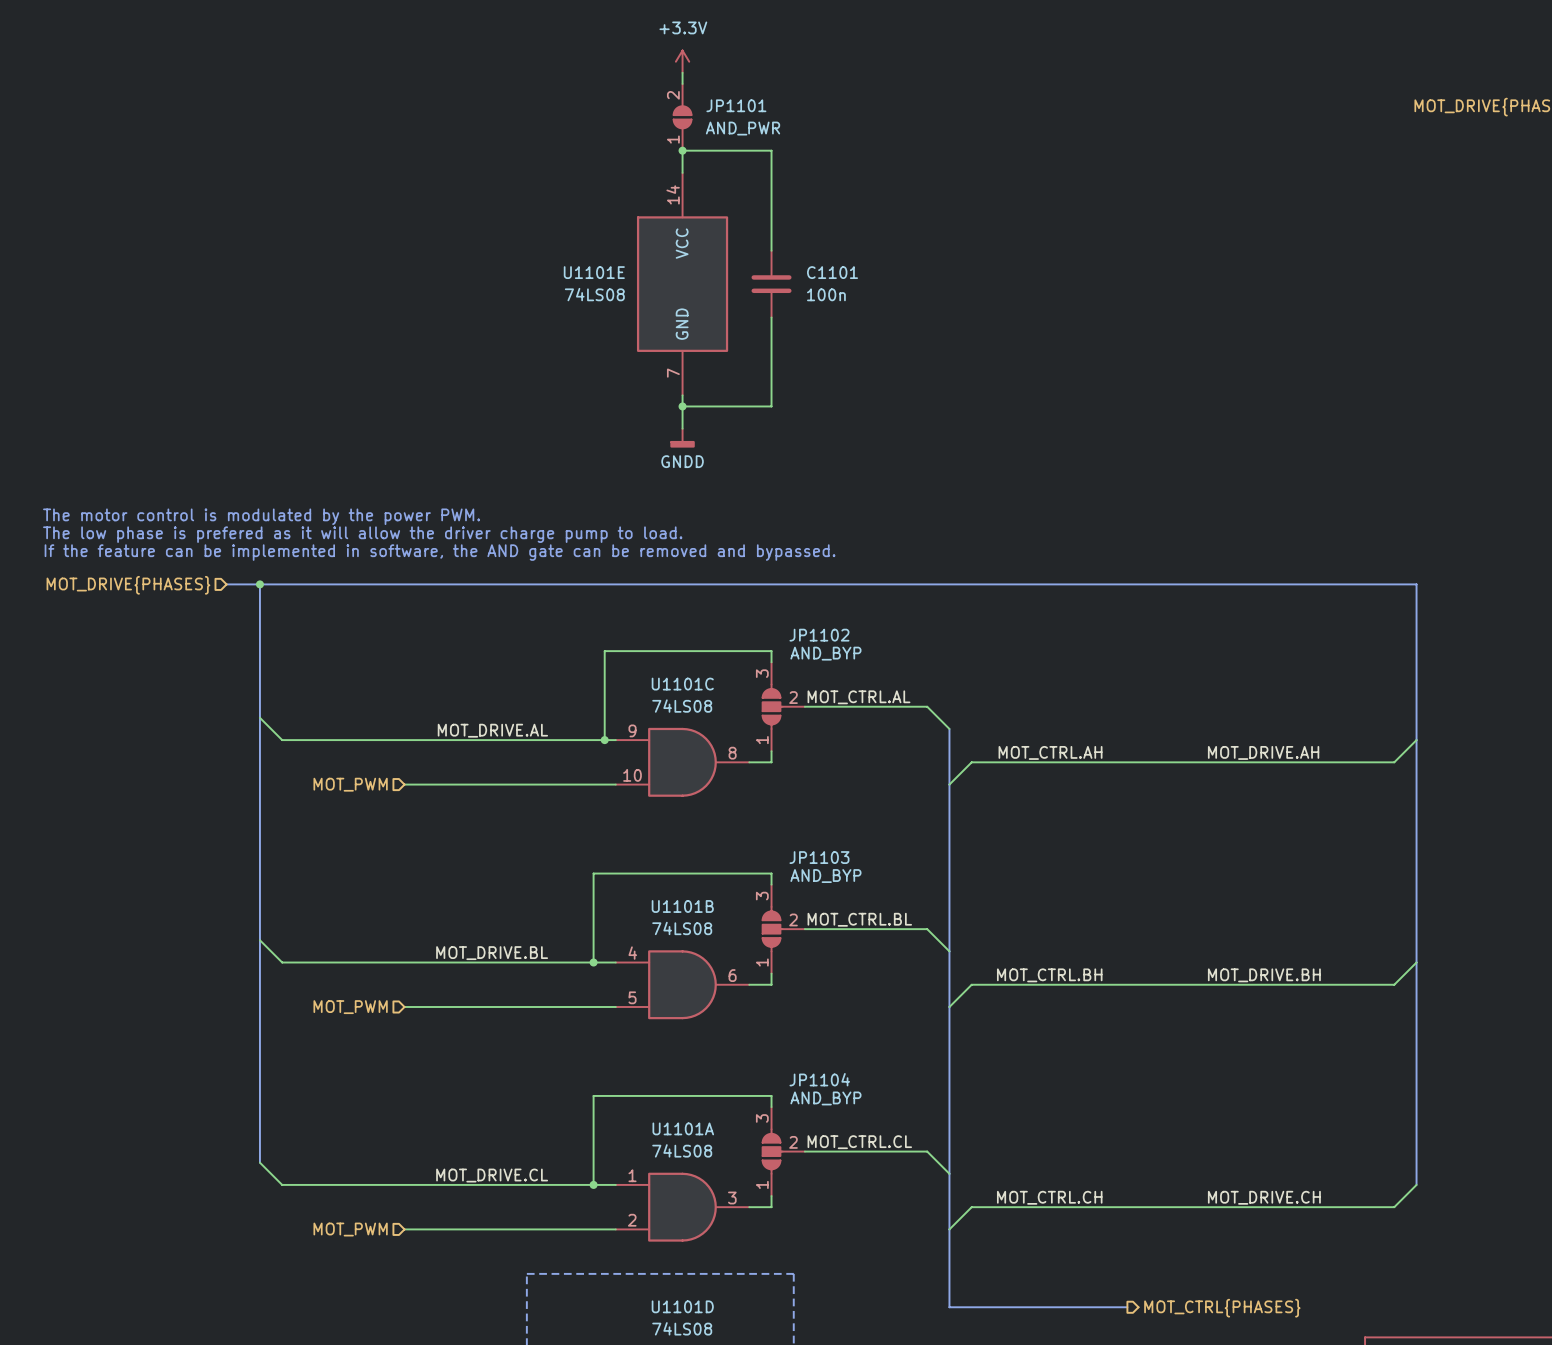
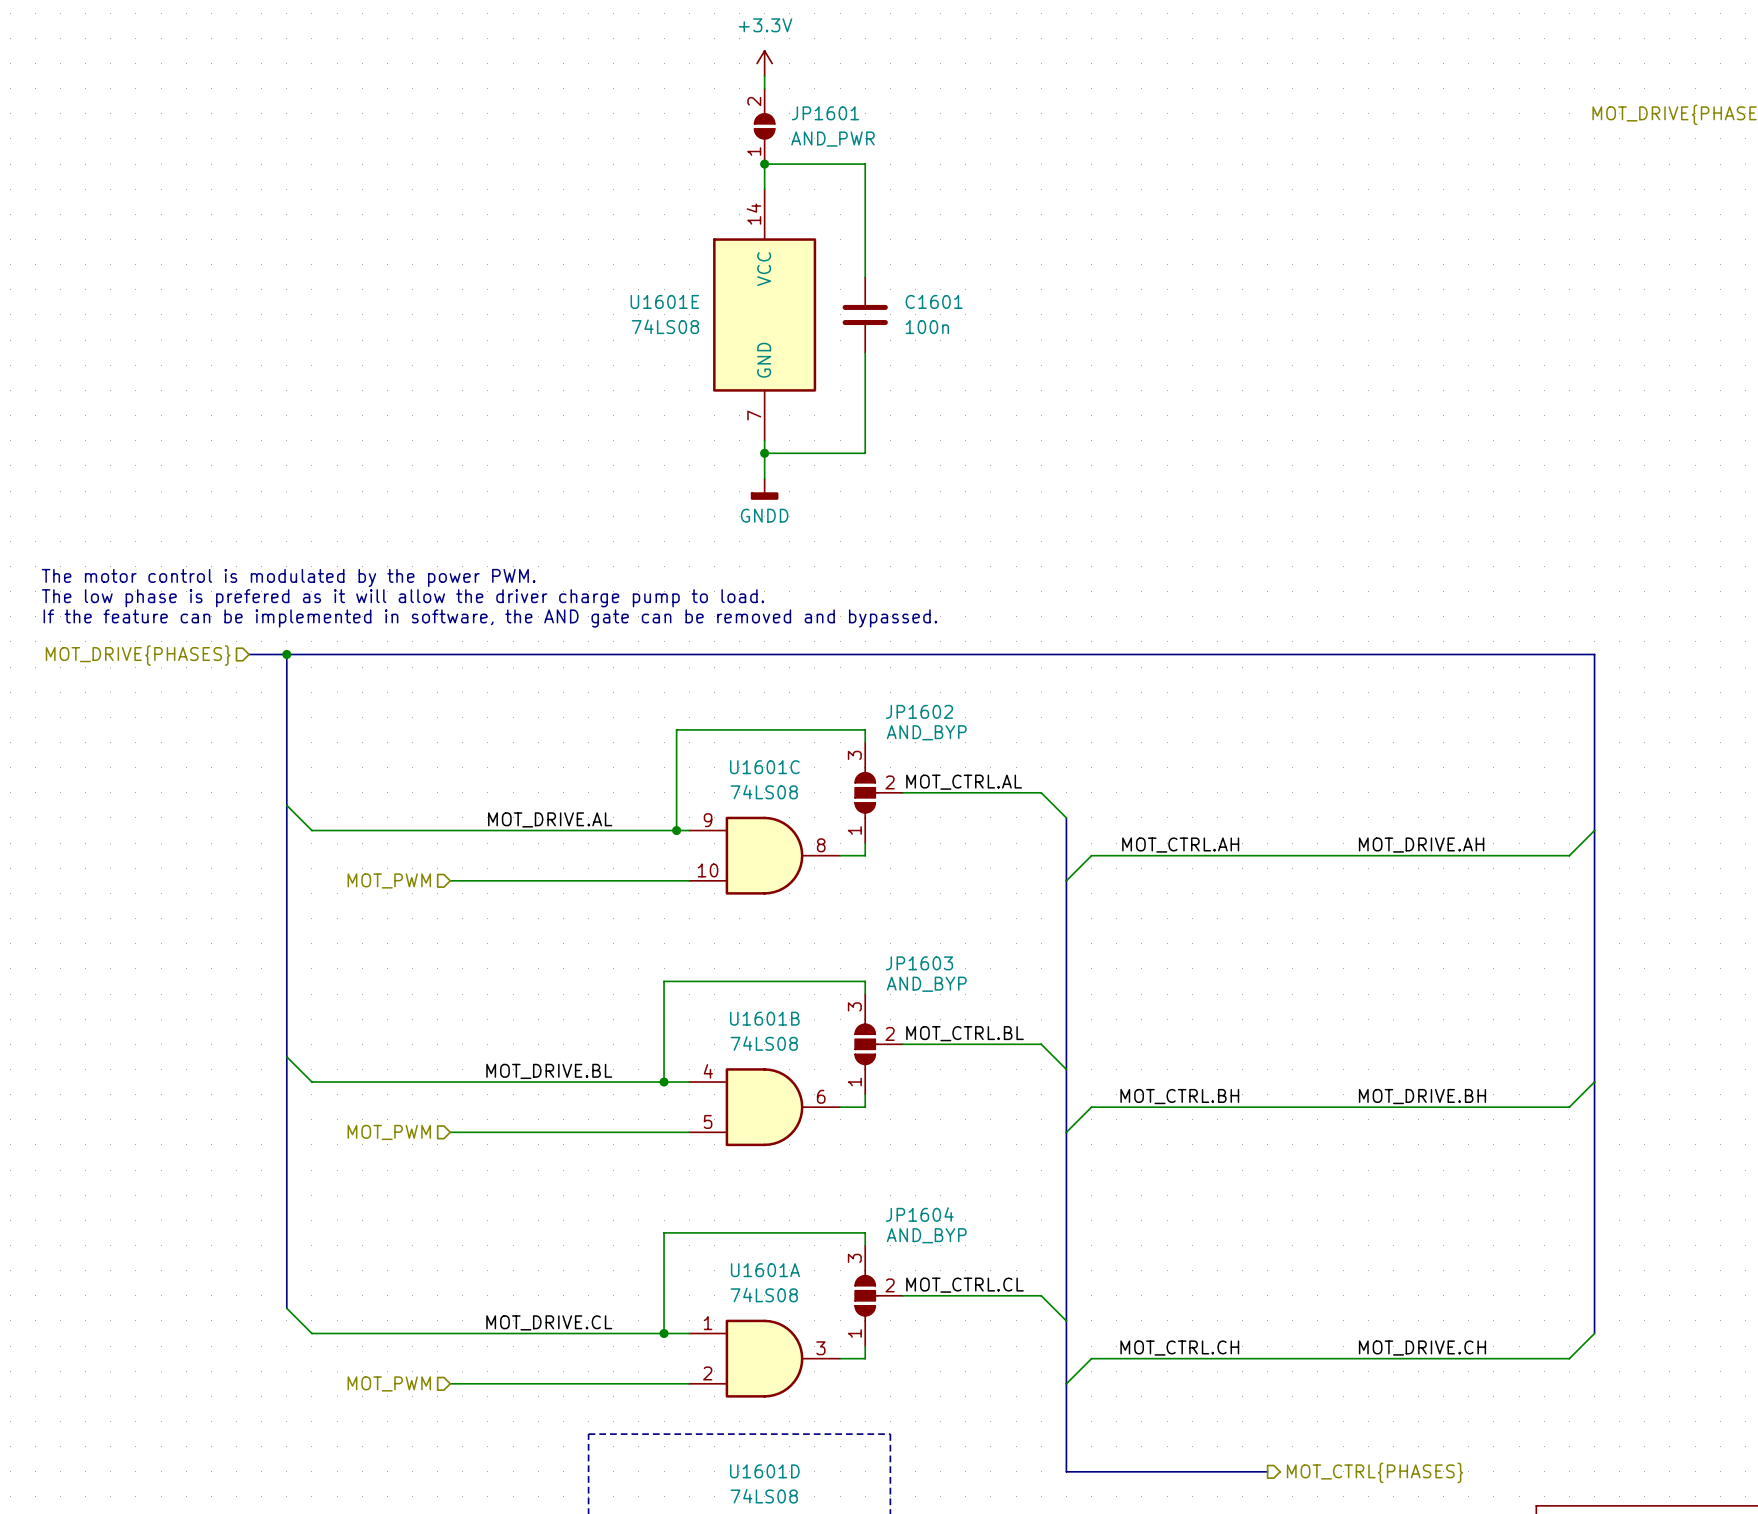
JP1101 name: JP1101 (736, 105) -> JP1601 (825, 113)
U1101E name: U1101E (594, 272) -> U1601E (664, 301)
C1101 name: C1101 (832, 272) -> C1601 (934, 301)
JP1102 name: JP1102 (819, 635) -> JP1602 (919, 711)
U1101C name: U1101C (682, 684) -> U1601C (764, 767)
JP1103 name: JP1103 (819, 857) -> JP1603 (919, 963)
U1101B name: U1101B (682, 906) -> U1601B (764, 1018)
JP1104 name: JP1104 (819, 1079) -> JP1604 (919, 1214)
U1101A name: U1101A (683, 1128) -> U1601A (765, 1270)
U1101D name: U1101D (682, 1306) -> U1601D (764, 1471)

